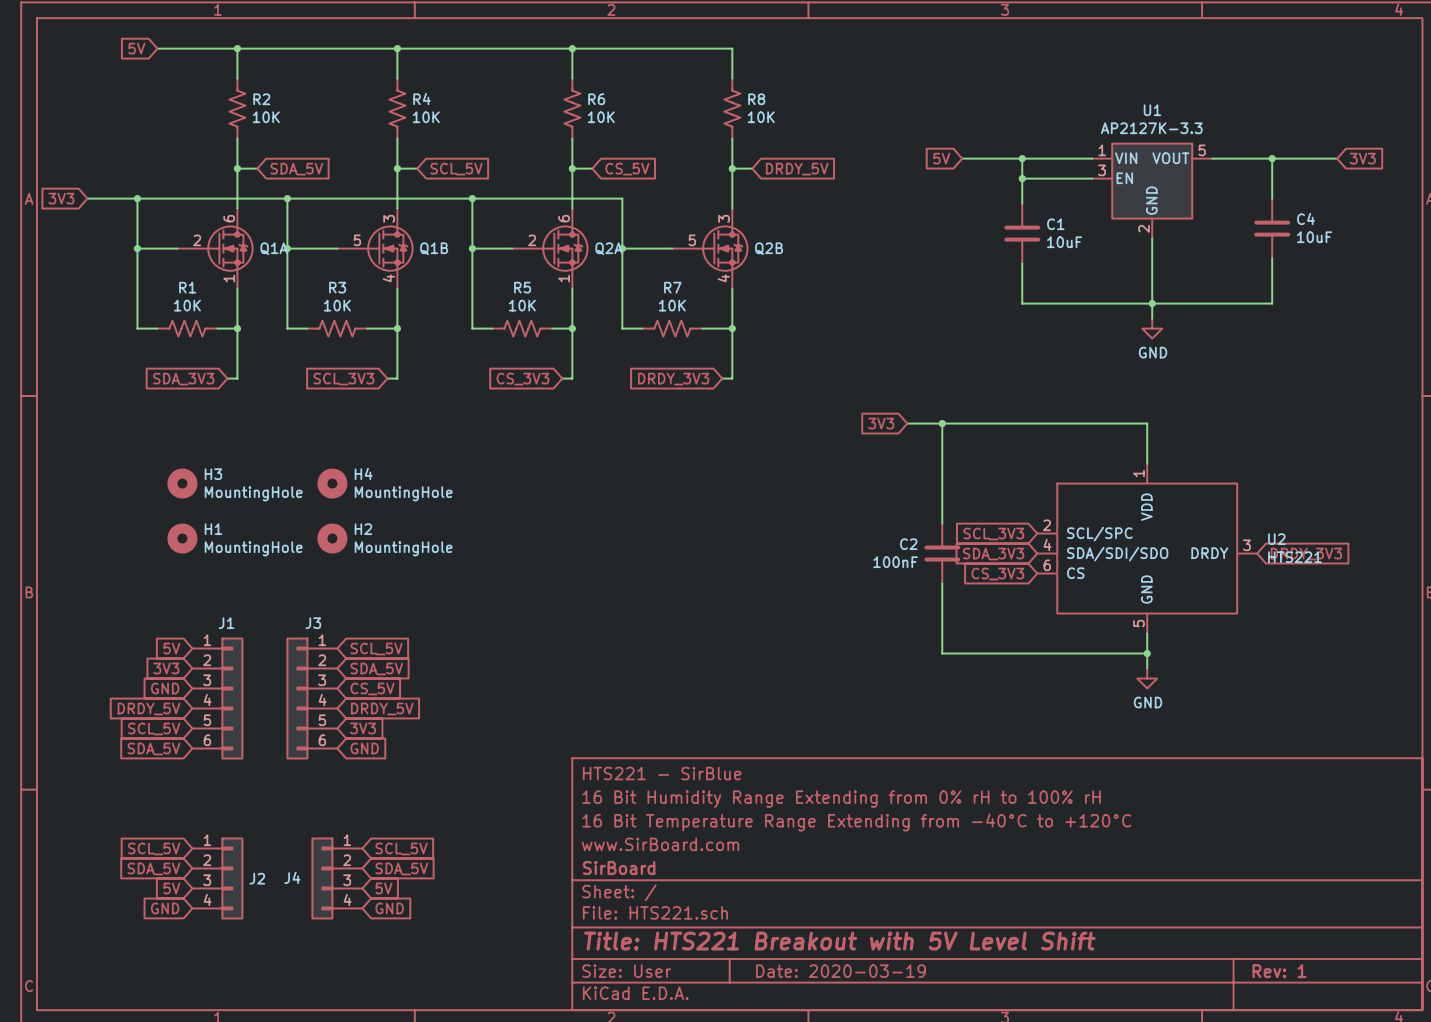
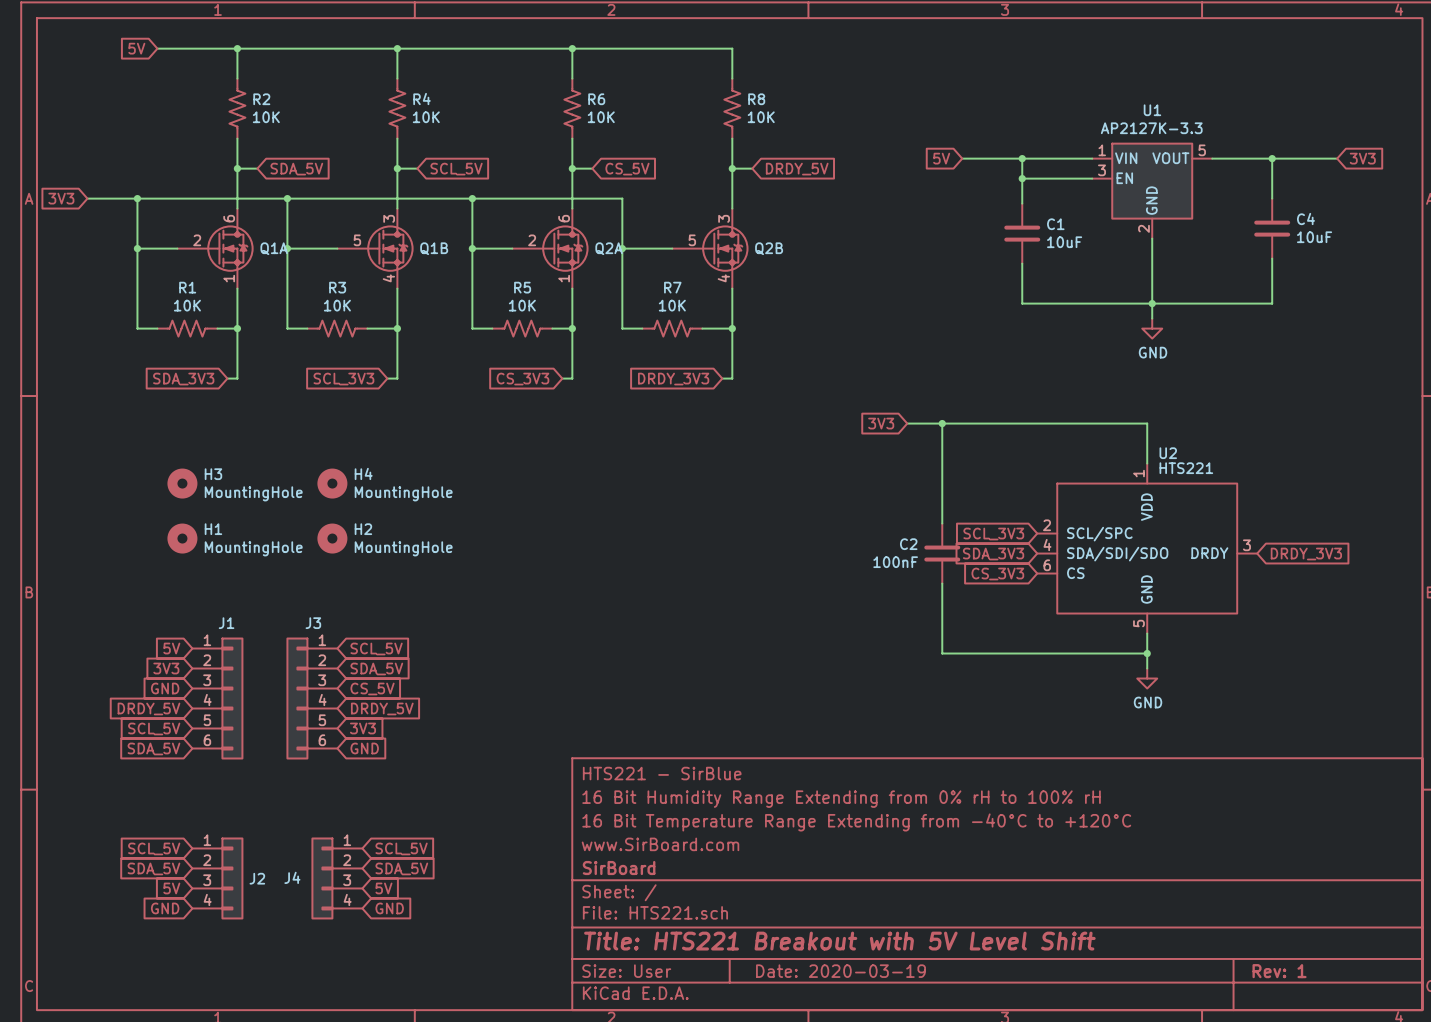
U2 name position: U2 (1276, 539) -> U2 (1168, 453)
U2 value position: HTS221 (1294, 557) -> HTS221 (1186, 468)

